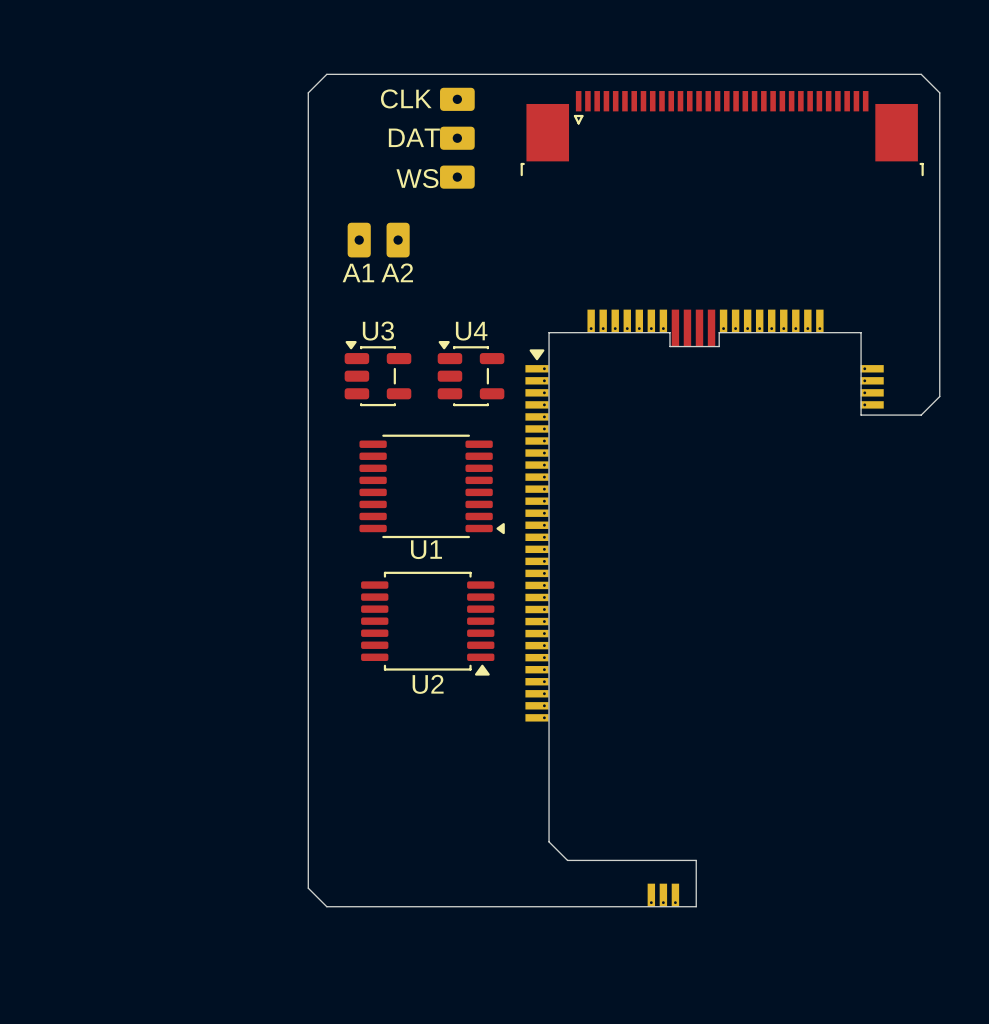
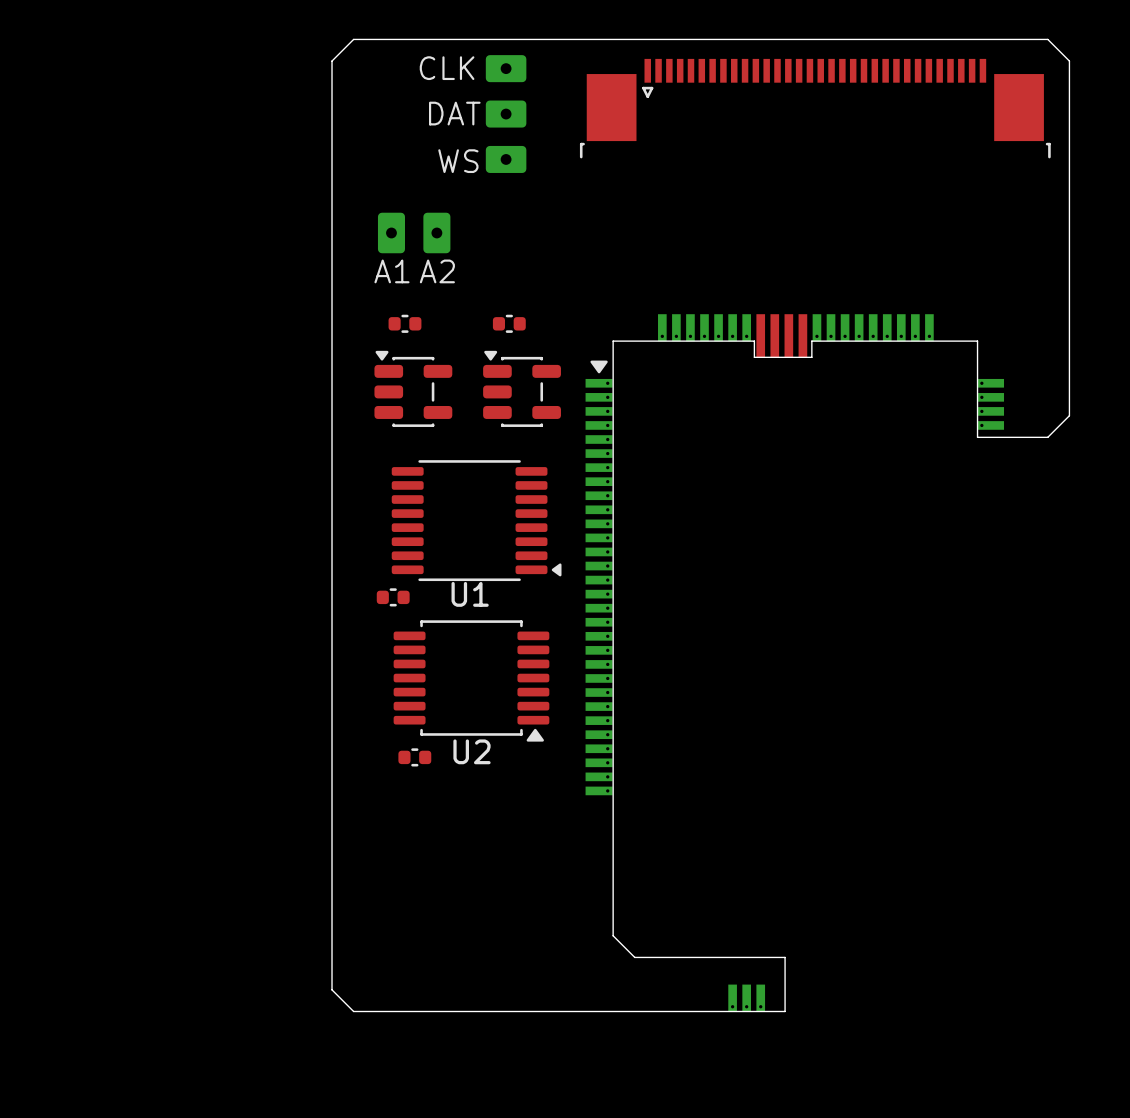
part: none -> (404, 323)
part: none -> (509, 323)
U3 name: U3 (378, 331) -> none
U4 name: U4 (471, 331) -> none
part: none -> (393, 597)
part: none -> (414, 757)

